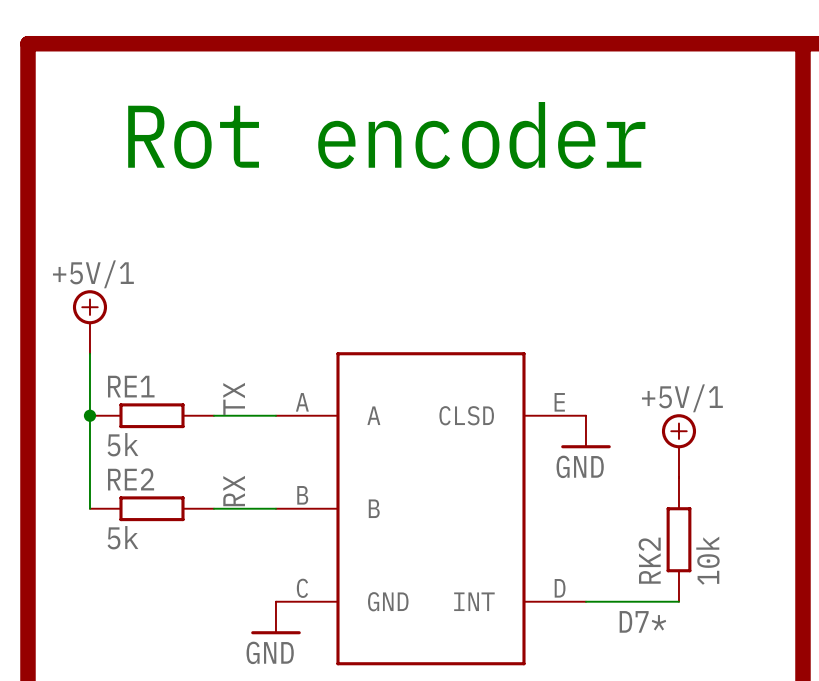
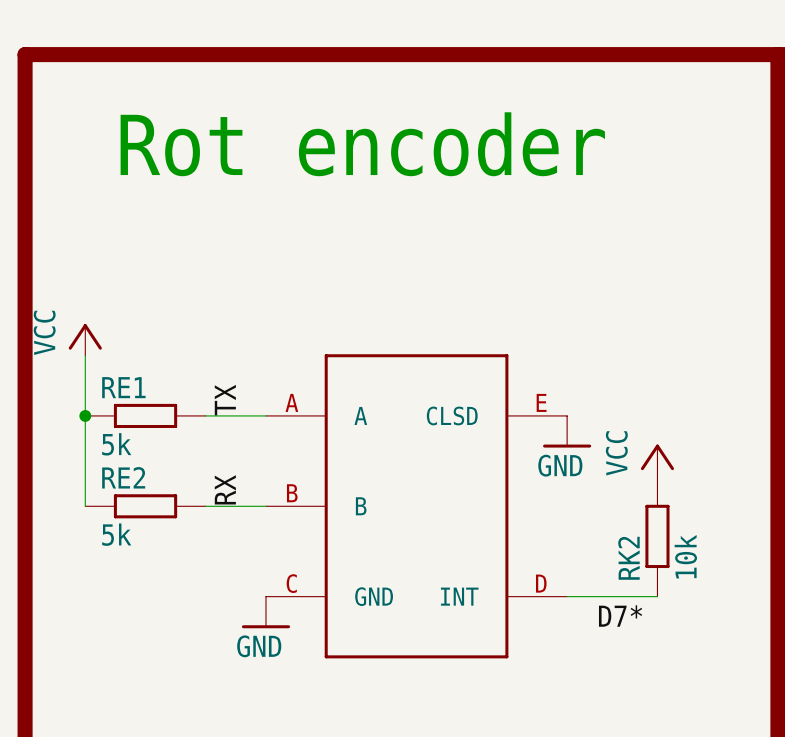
power symbol: +5V/1 (89, 321) -> none
power symbol: none -> VCC (85, 339)
power symbol: +5V/1 (678, 445) -> none
power symbol: none -> VCC (657, 460)

